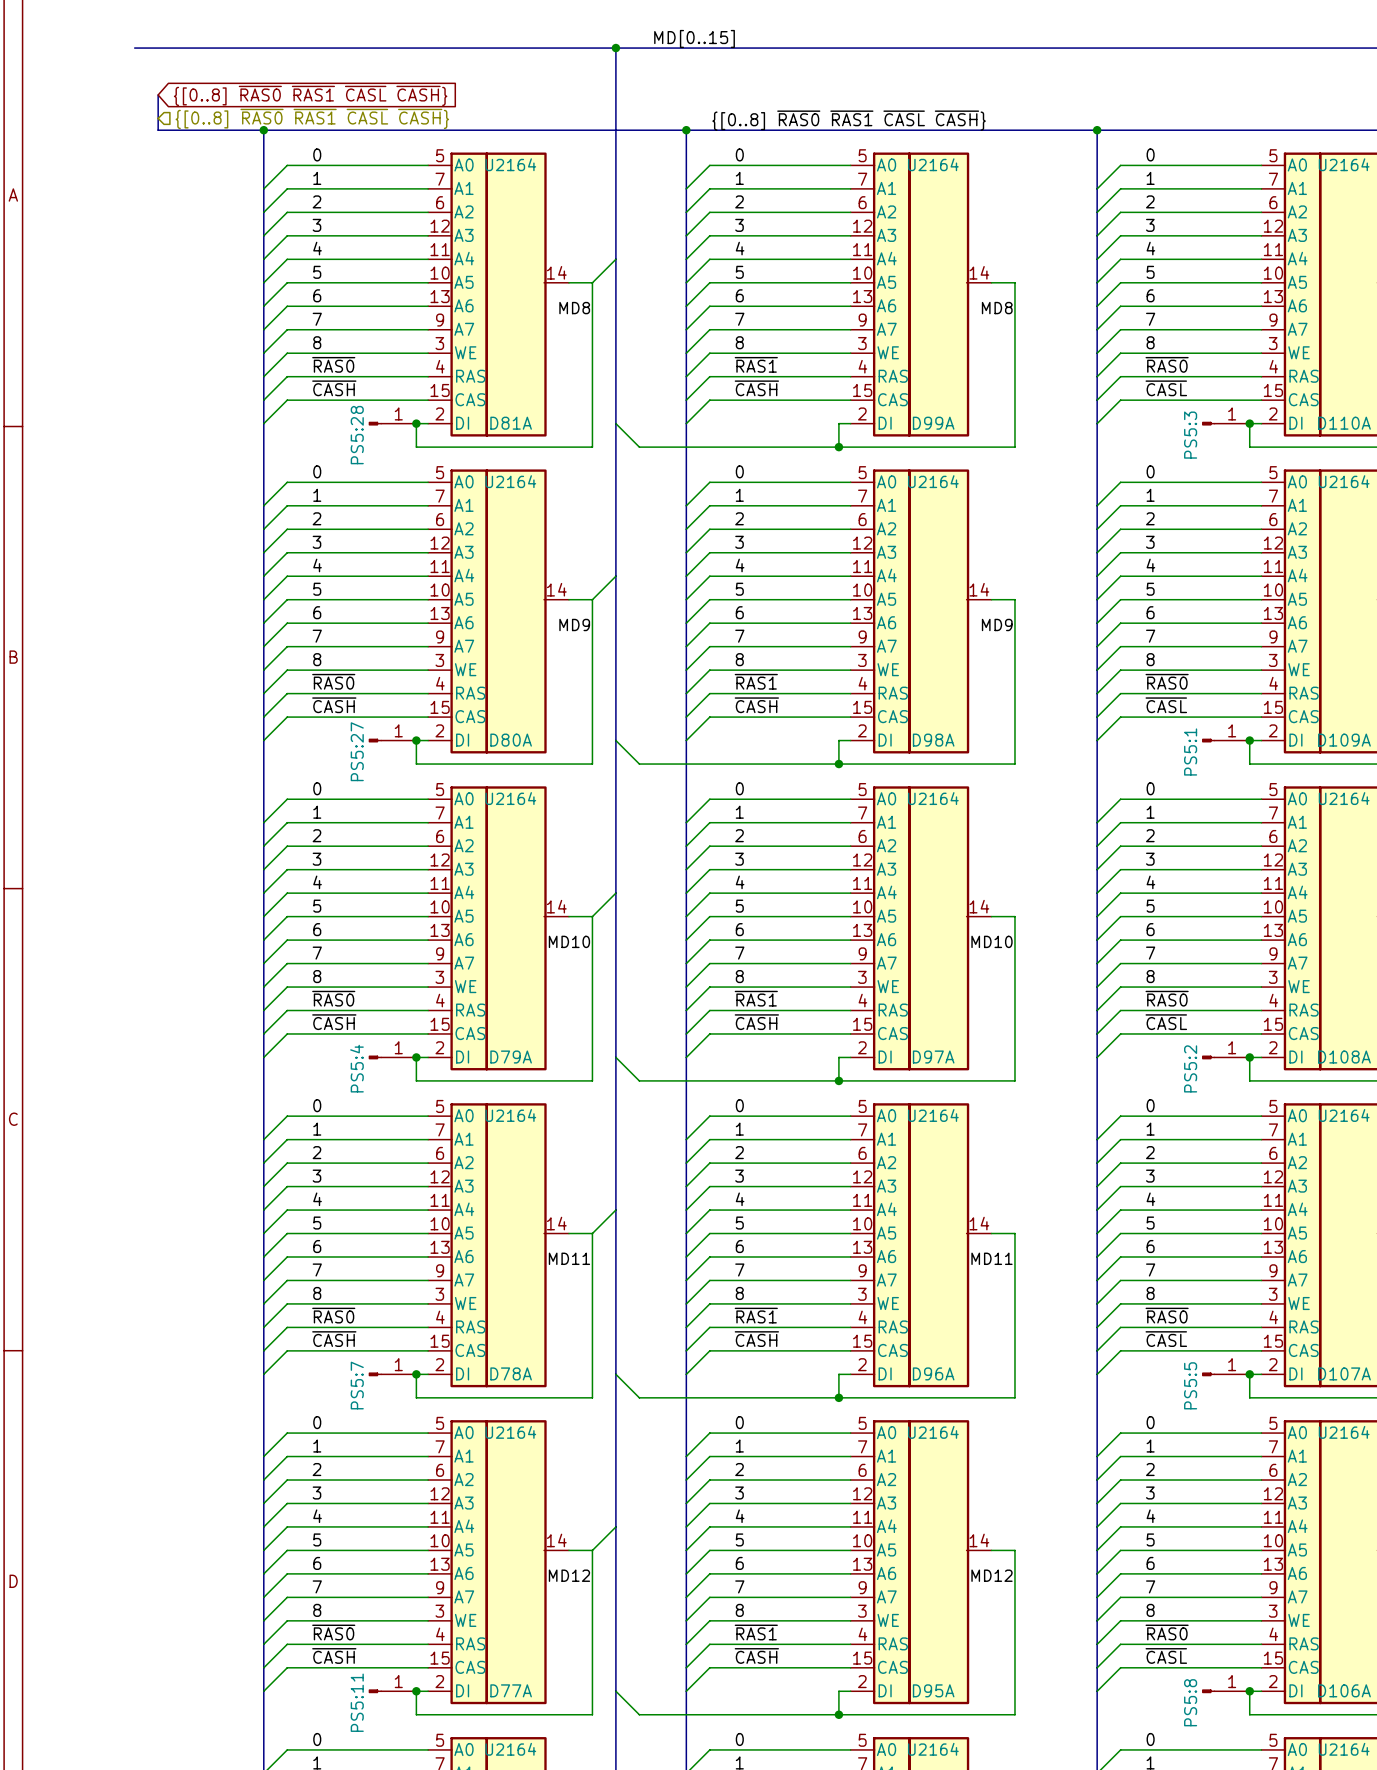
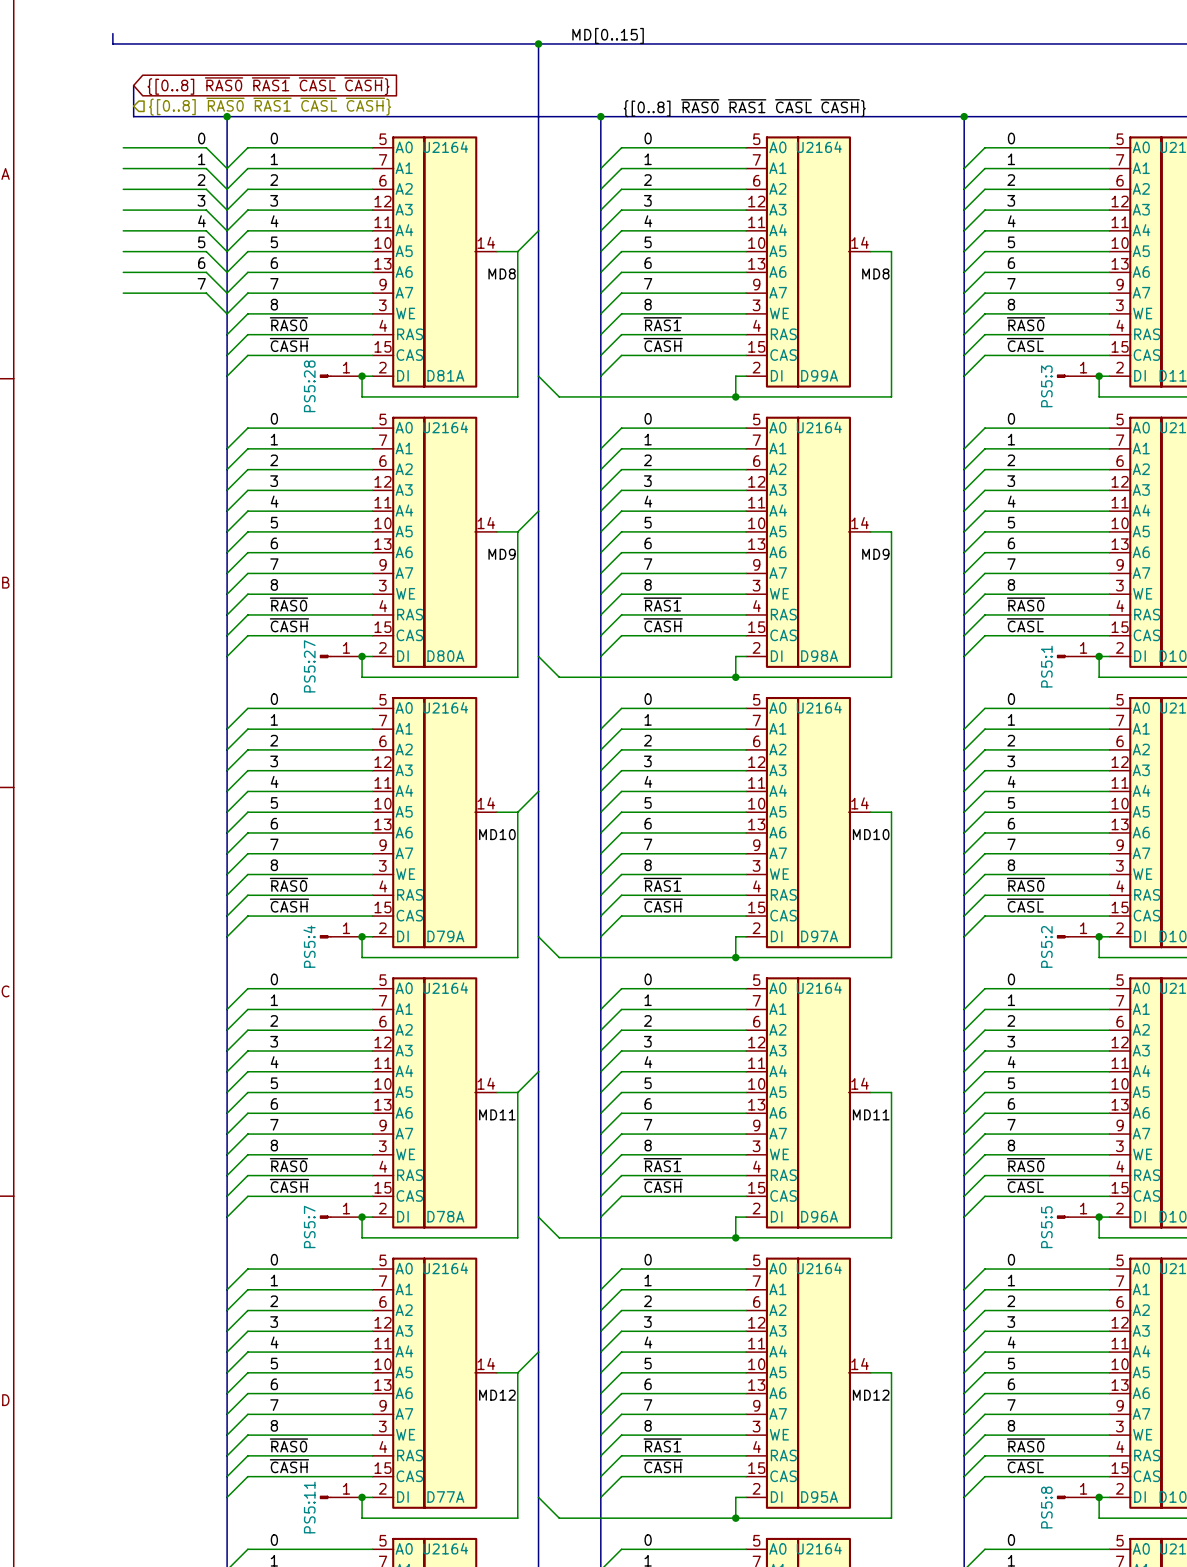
bus: none -> (112, 33) (112, 43)
label: none -> 0 (201, 138)
wire: none -> (123, 147) (206, 147) (227, 168)
label: none -> 1 (201, 159)
wire: none -> (123, 168) (206, 168) (227, 189)
label: none -> 2 (201, 180)
wire: none -> (123, 189) (206, 189) (227, 210)
label: none -> 3 (201, 200)
wire: none -> (123, 210) (206, 210) (227, 230)
label: none -> 4 (201, 221)
wire: none -> (123, 230) (206, 230) (227, 251)
label: none -> 5 (201, 242)
wire: none -> (123, 251) (206, 251) (227, 272)
label: none -> 6 (201, 263)
wire: none -> (123, 272) (206, 272) (227, 293)
label: none -> 7 (201, 283)
wire: none -> (123, 293) (206, 293) (227, 313)

